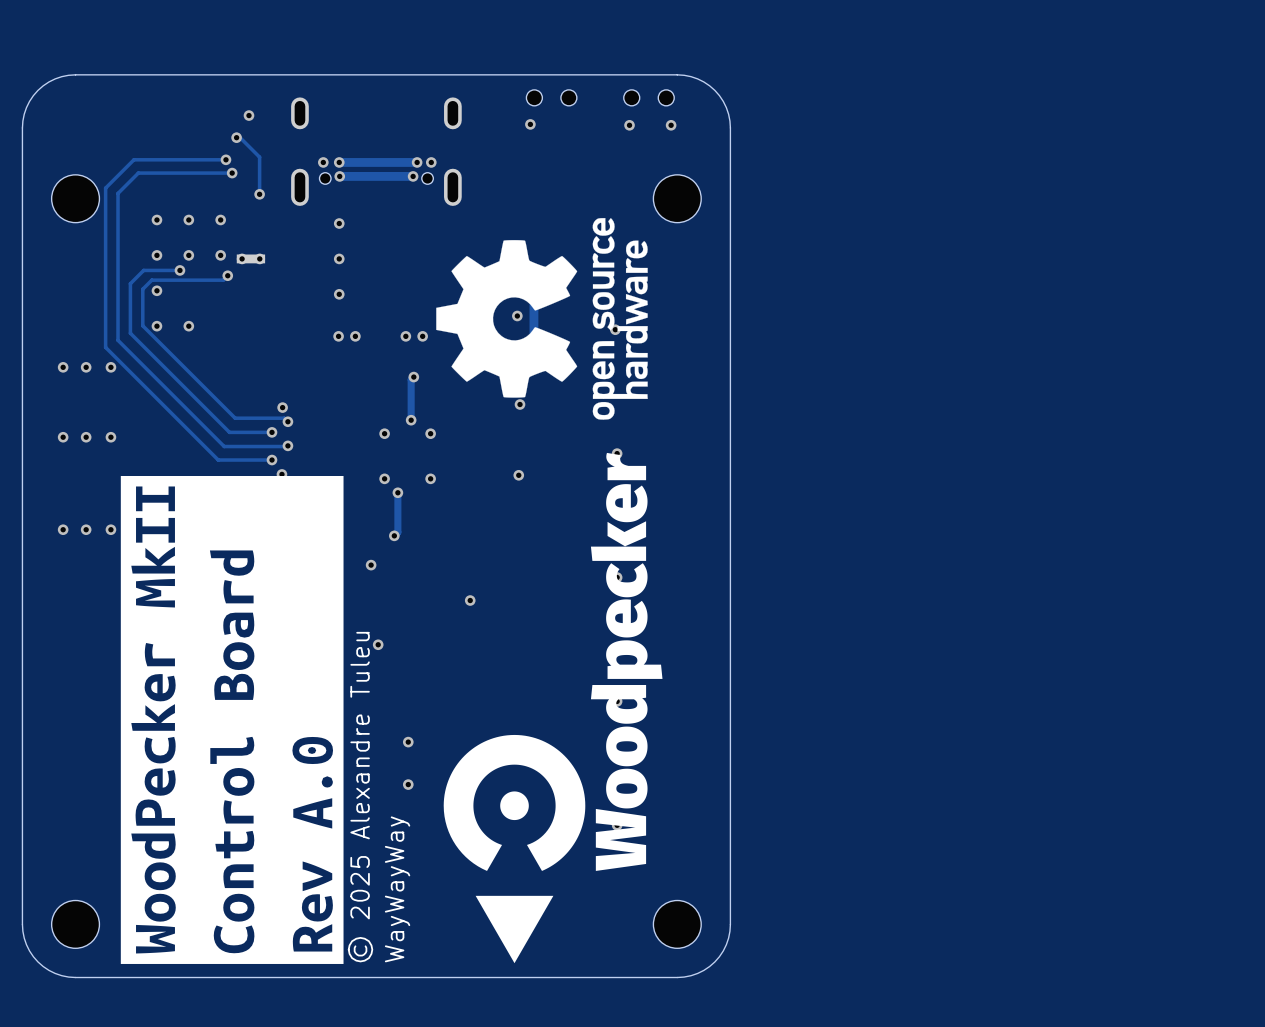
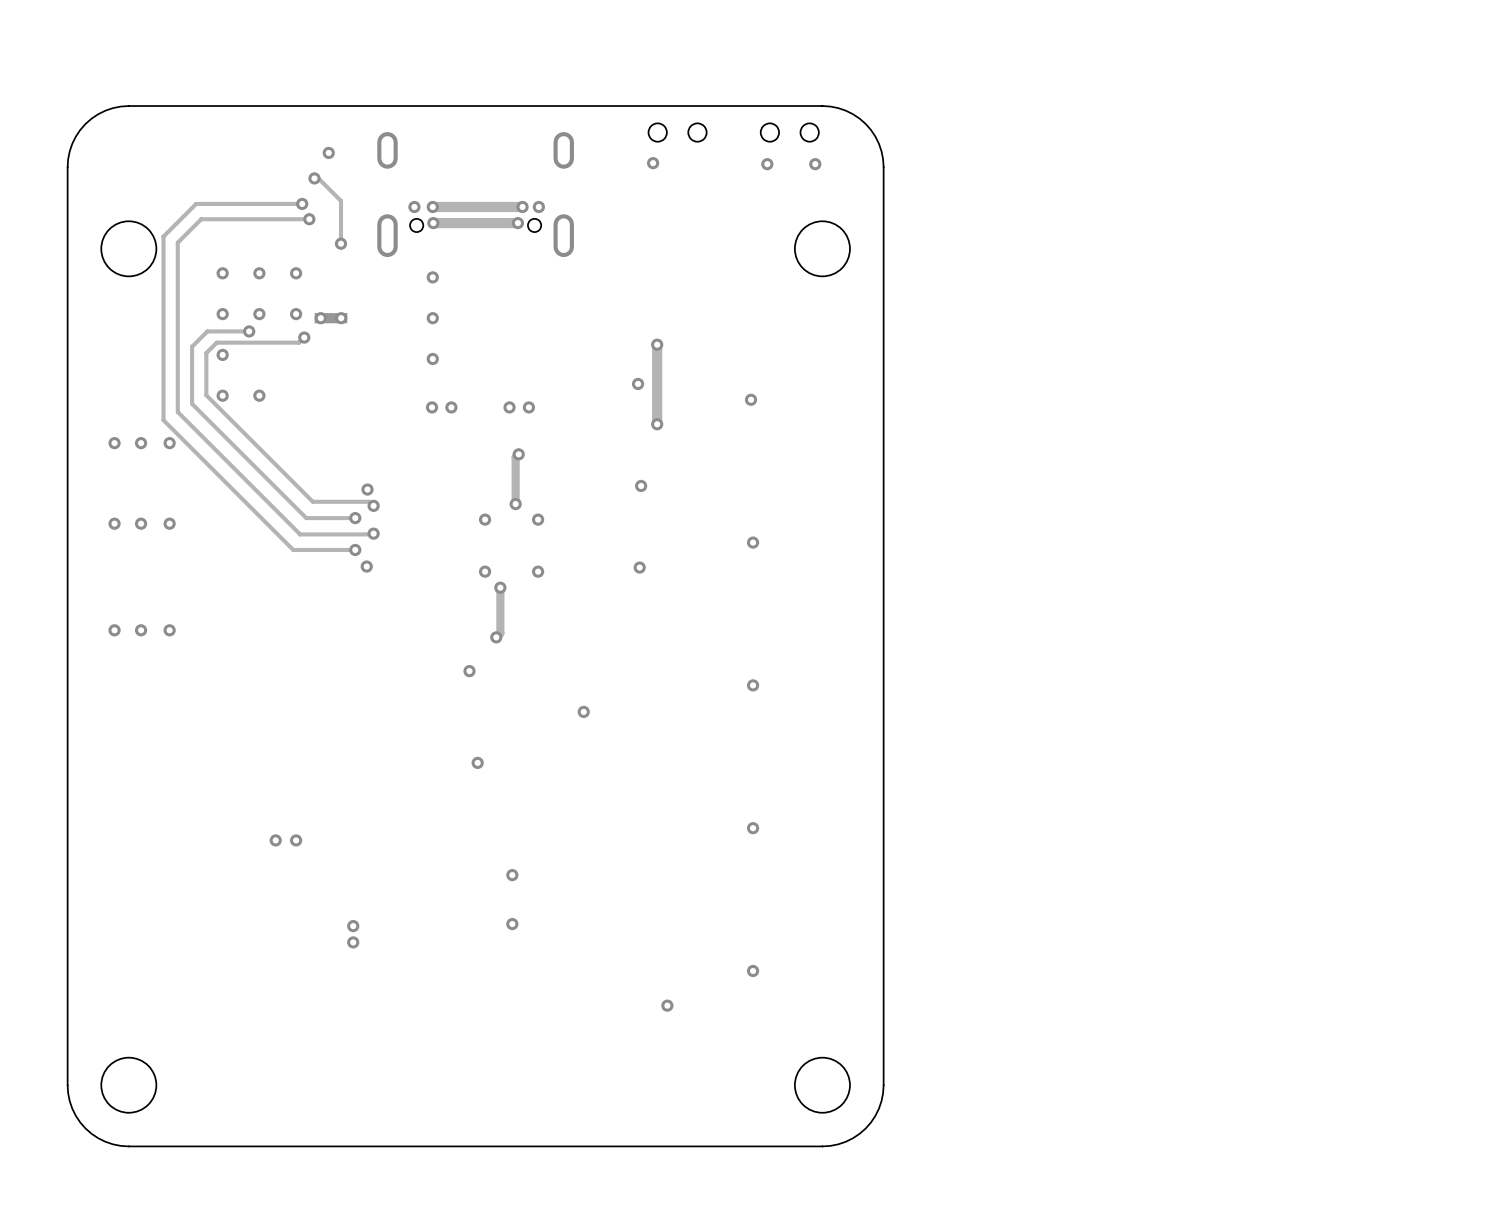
drawing: [436, 218, 648, 420] -> none
drawing: [443, 452, 663, 871] -> none
drawing: [120, 476, 344, 964] -> none
text: © 2025 Alexandre Tuleu (360, 797) -> none
text: WayWayWay (397, 889) -> none
drawing: [475, 895, 554, 964] -> none

